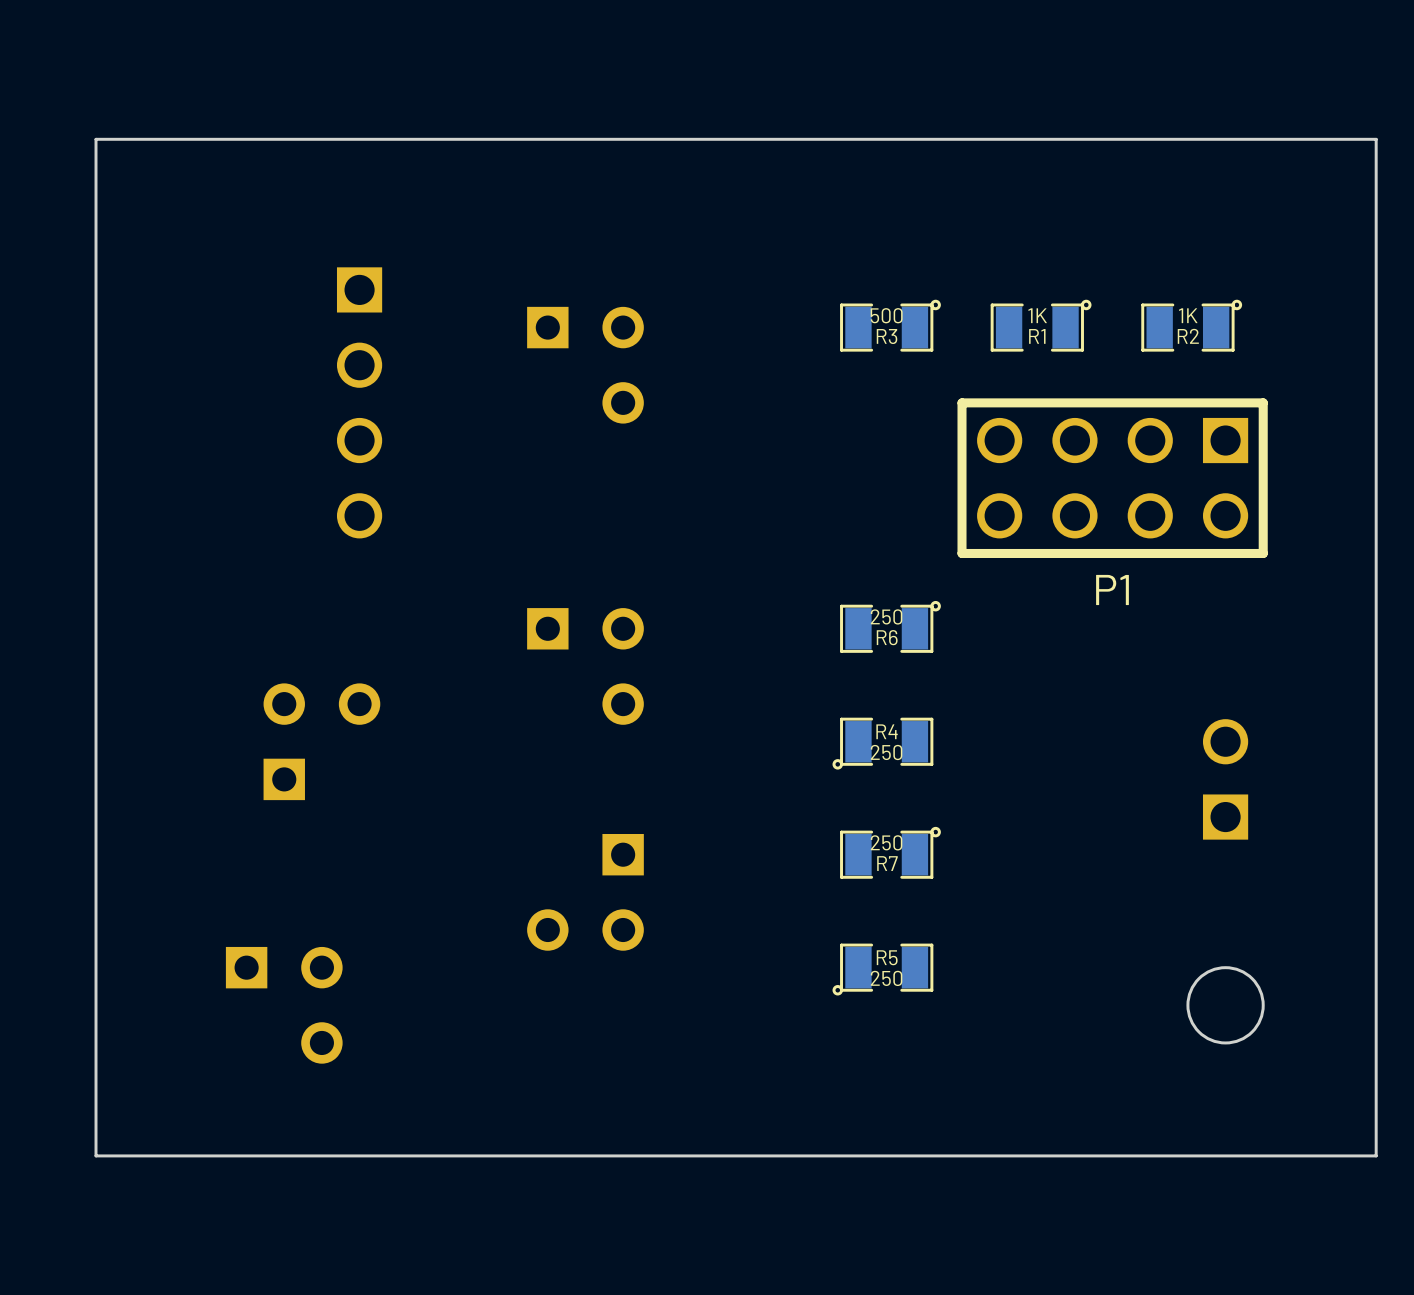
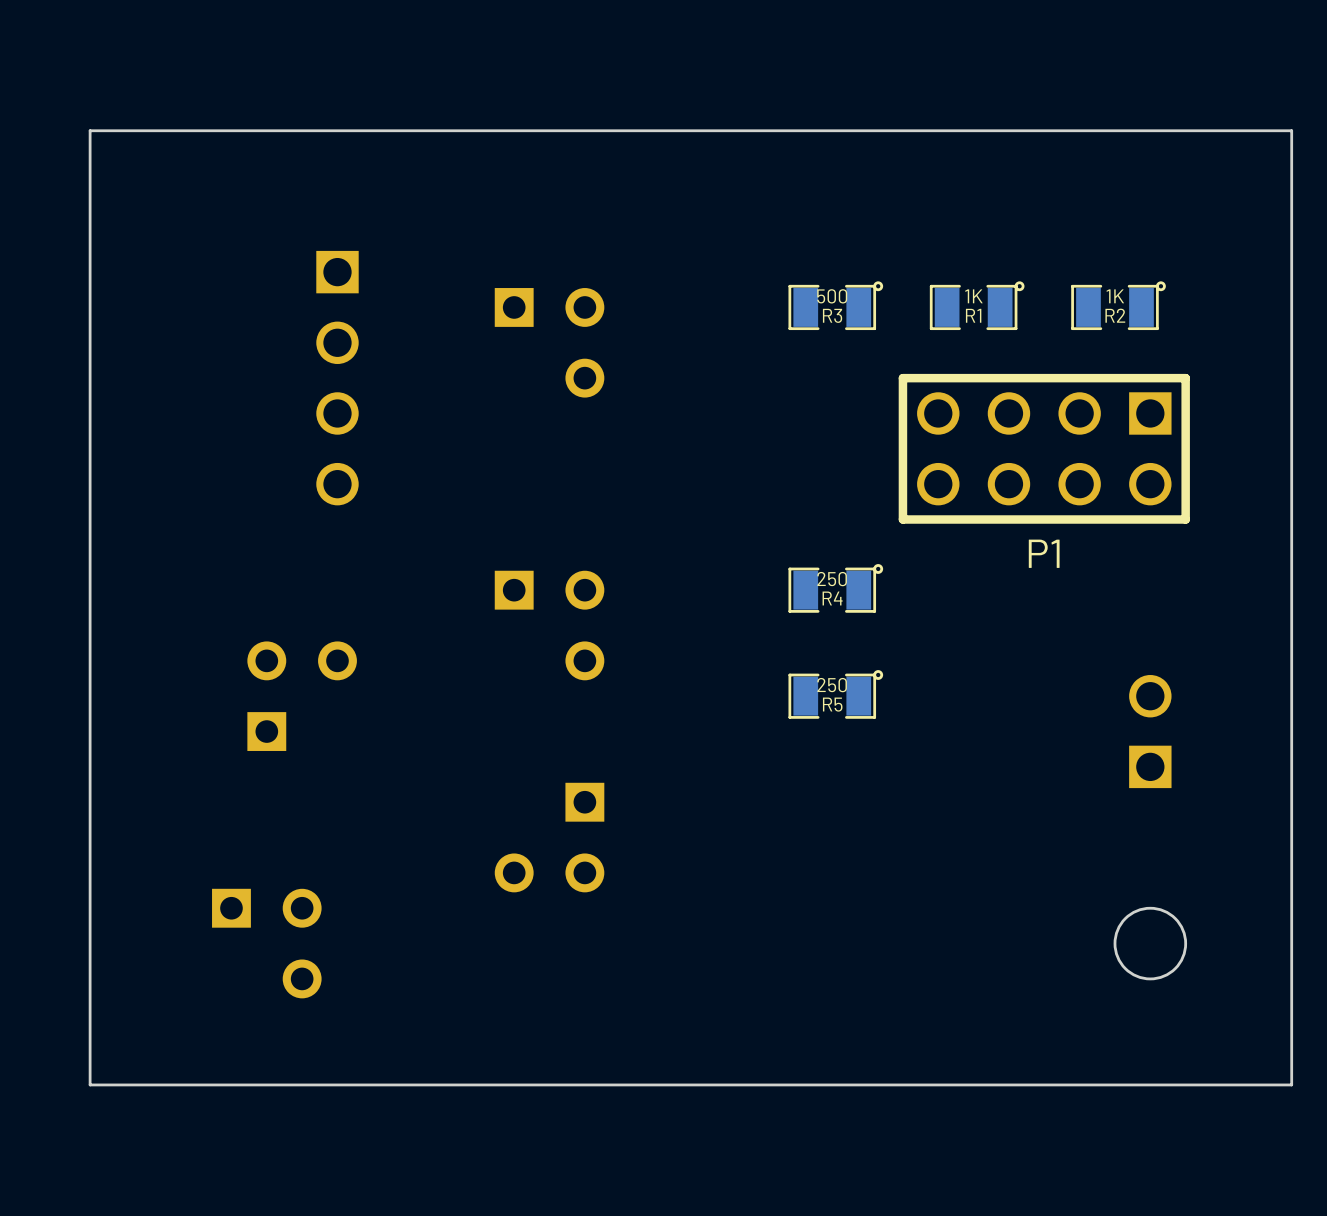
R6 name: R6 (887, 637) -> R4 (832, 598)
R4: 250 (882, 743) -> none
R7: 250 (890, 852) -> none
R5 rotation: 0° (882, 969) -> 180° (835, 694)
R5 position: (882, 969) -> (835, 694)

